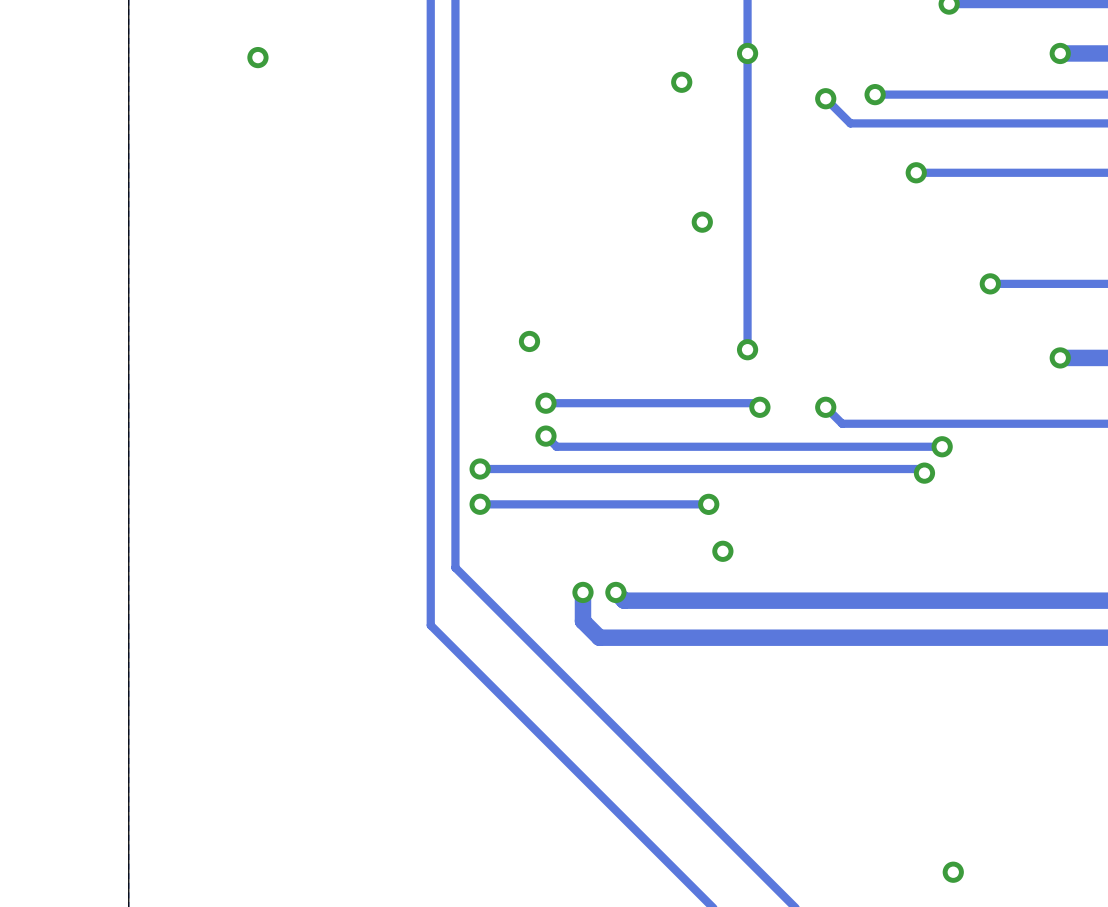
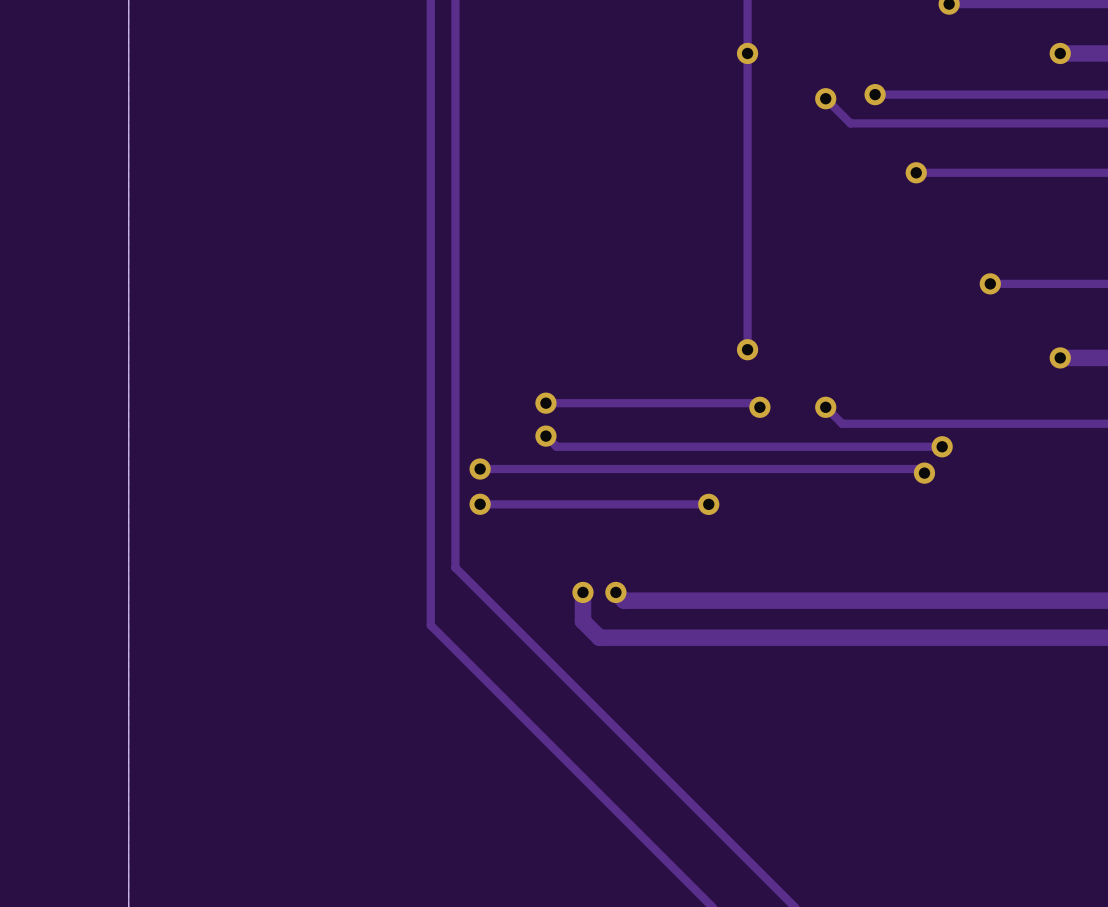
via: (257, 57) -> none
via: (681, 82) -> none
via: (702, 222) -> none
via: (529, 341) -> none
via: (722, 551) -> none
via: (953, 872) -> none

